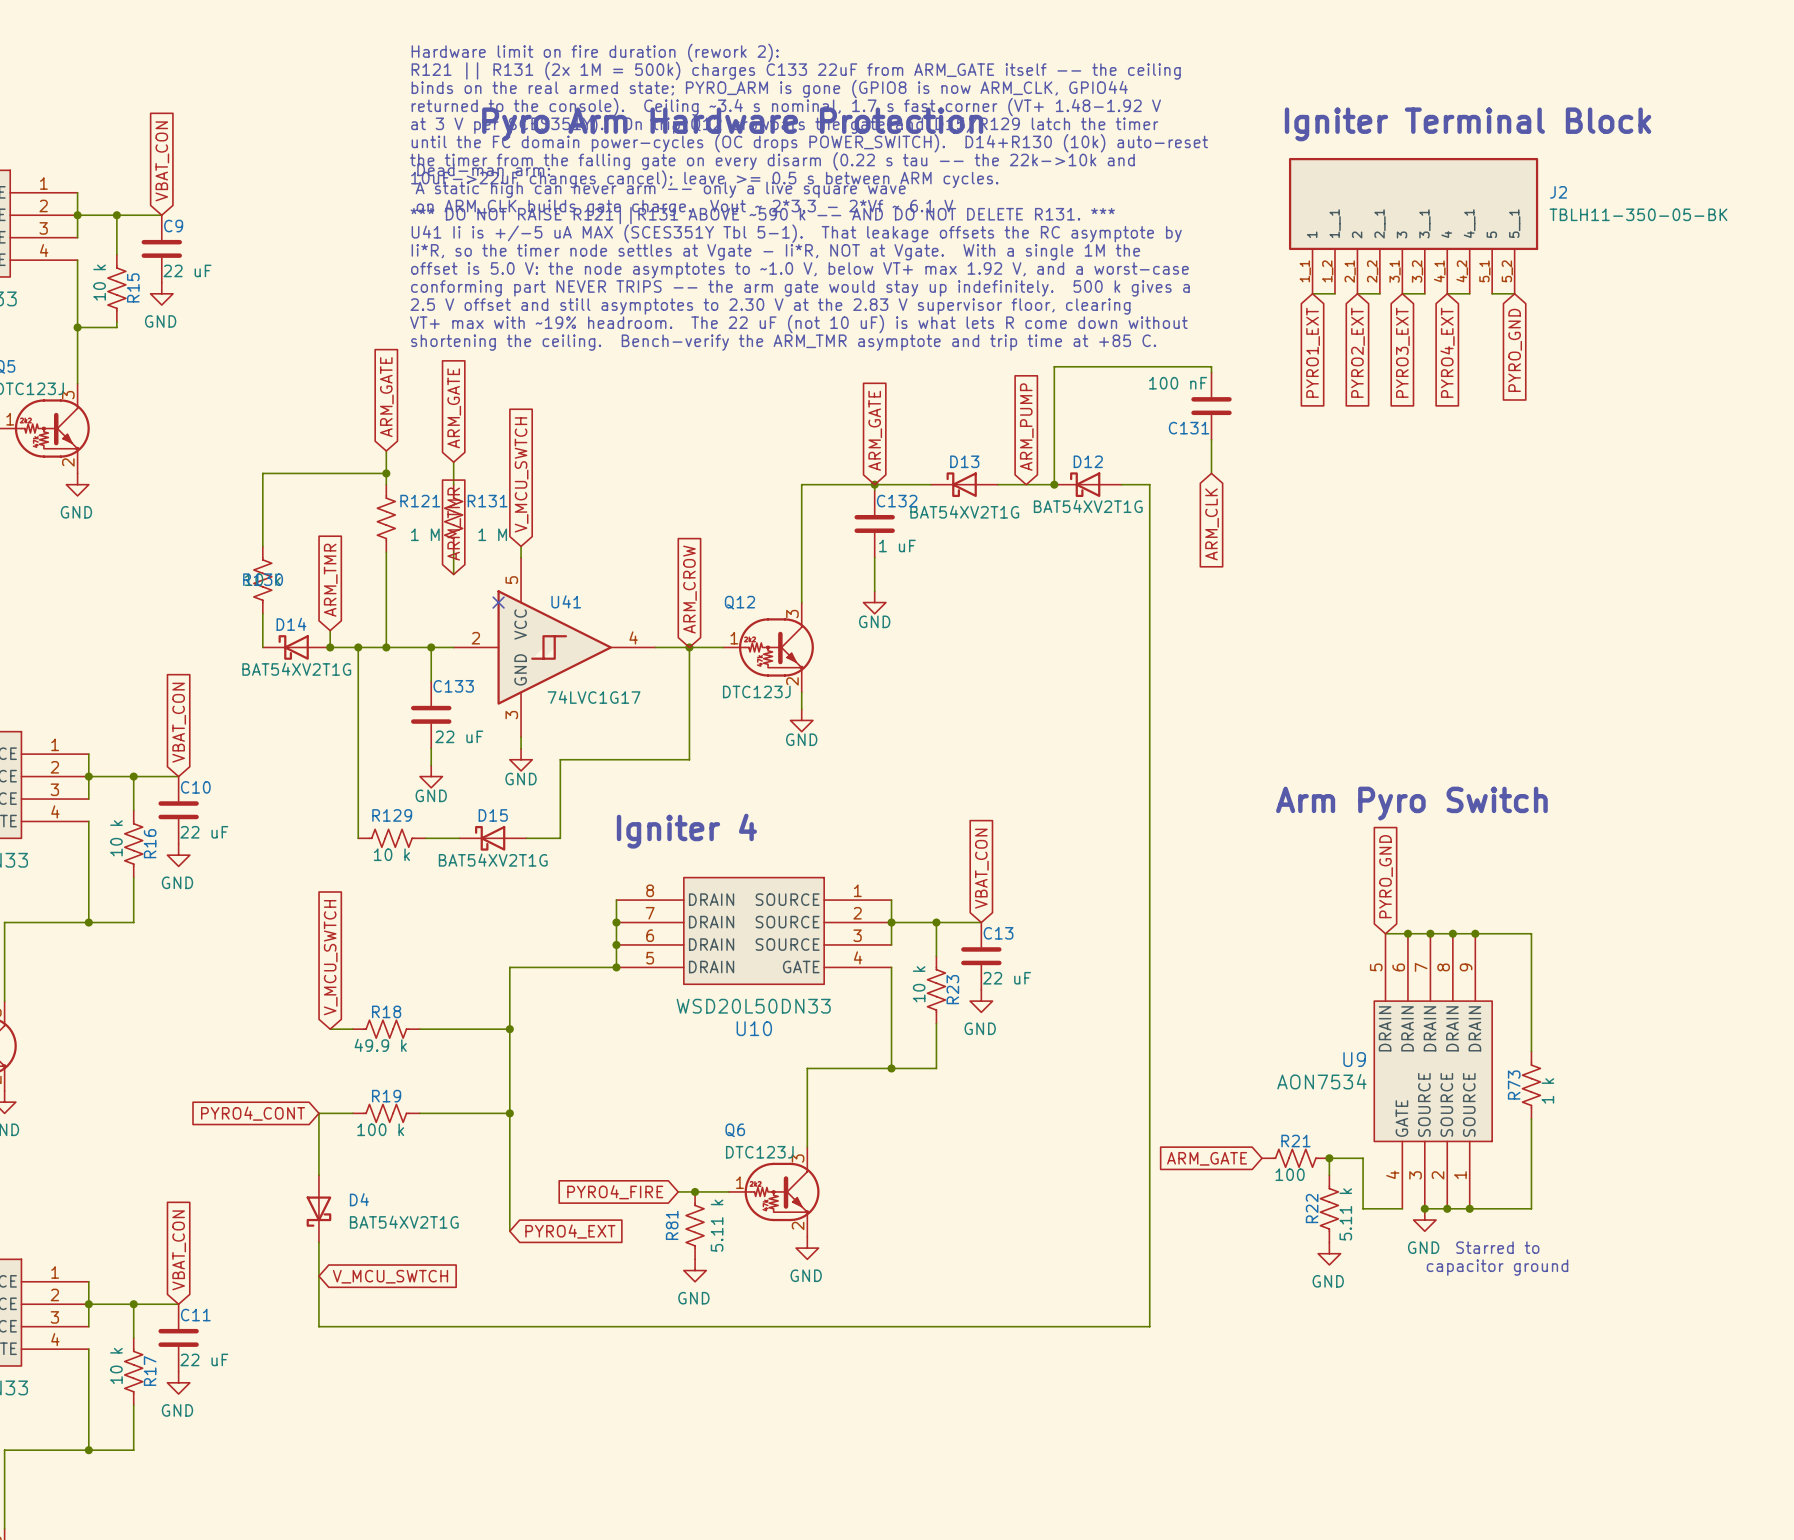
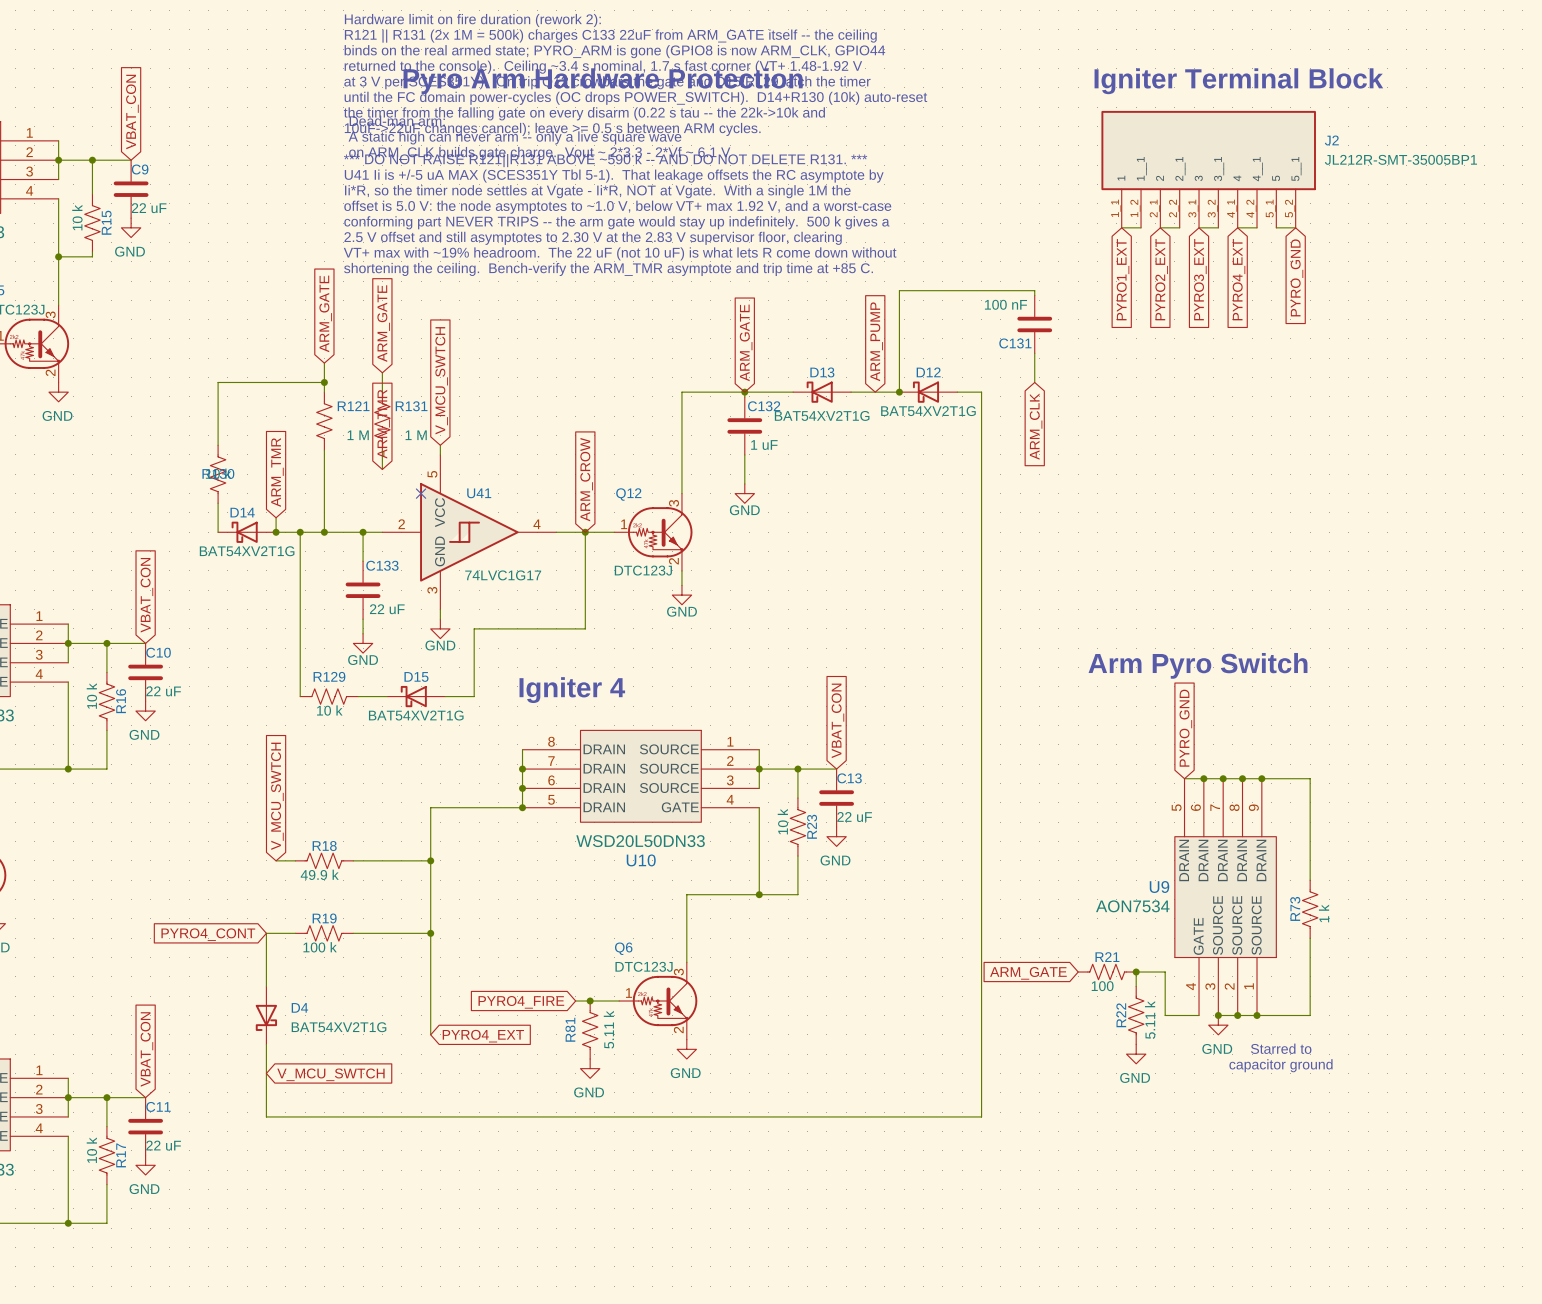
J2 value: TBLH11-350-05-BK (1638, 214) -> JL212R-SMT-35005BP1 (1400, 159)

